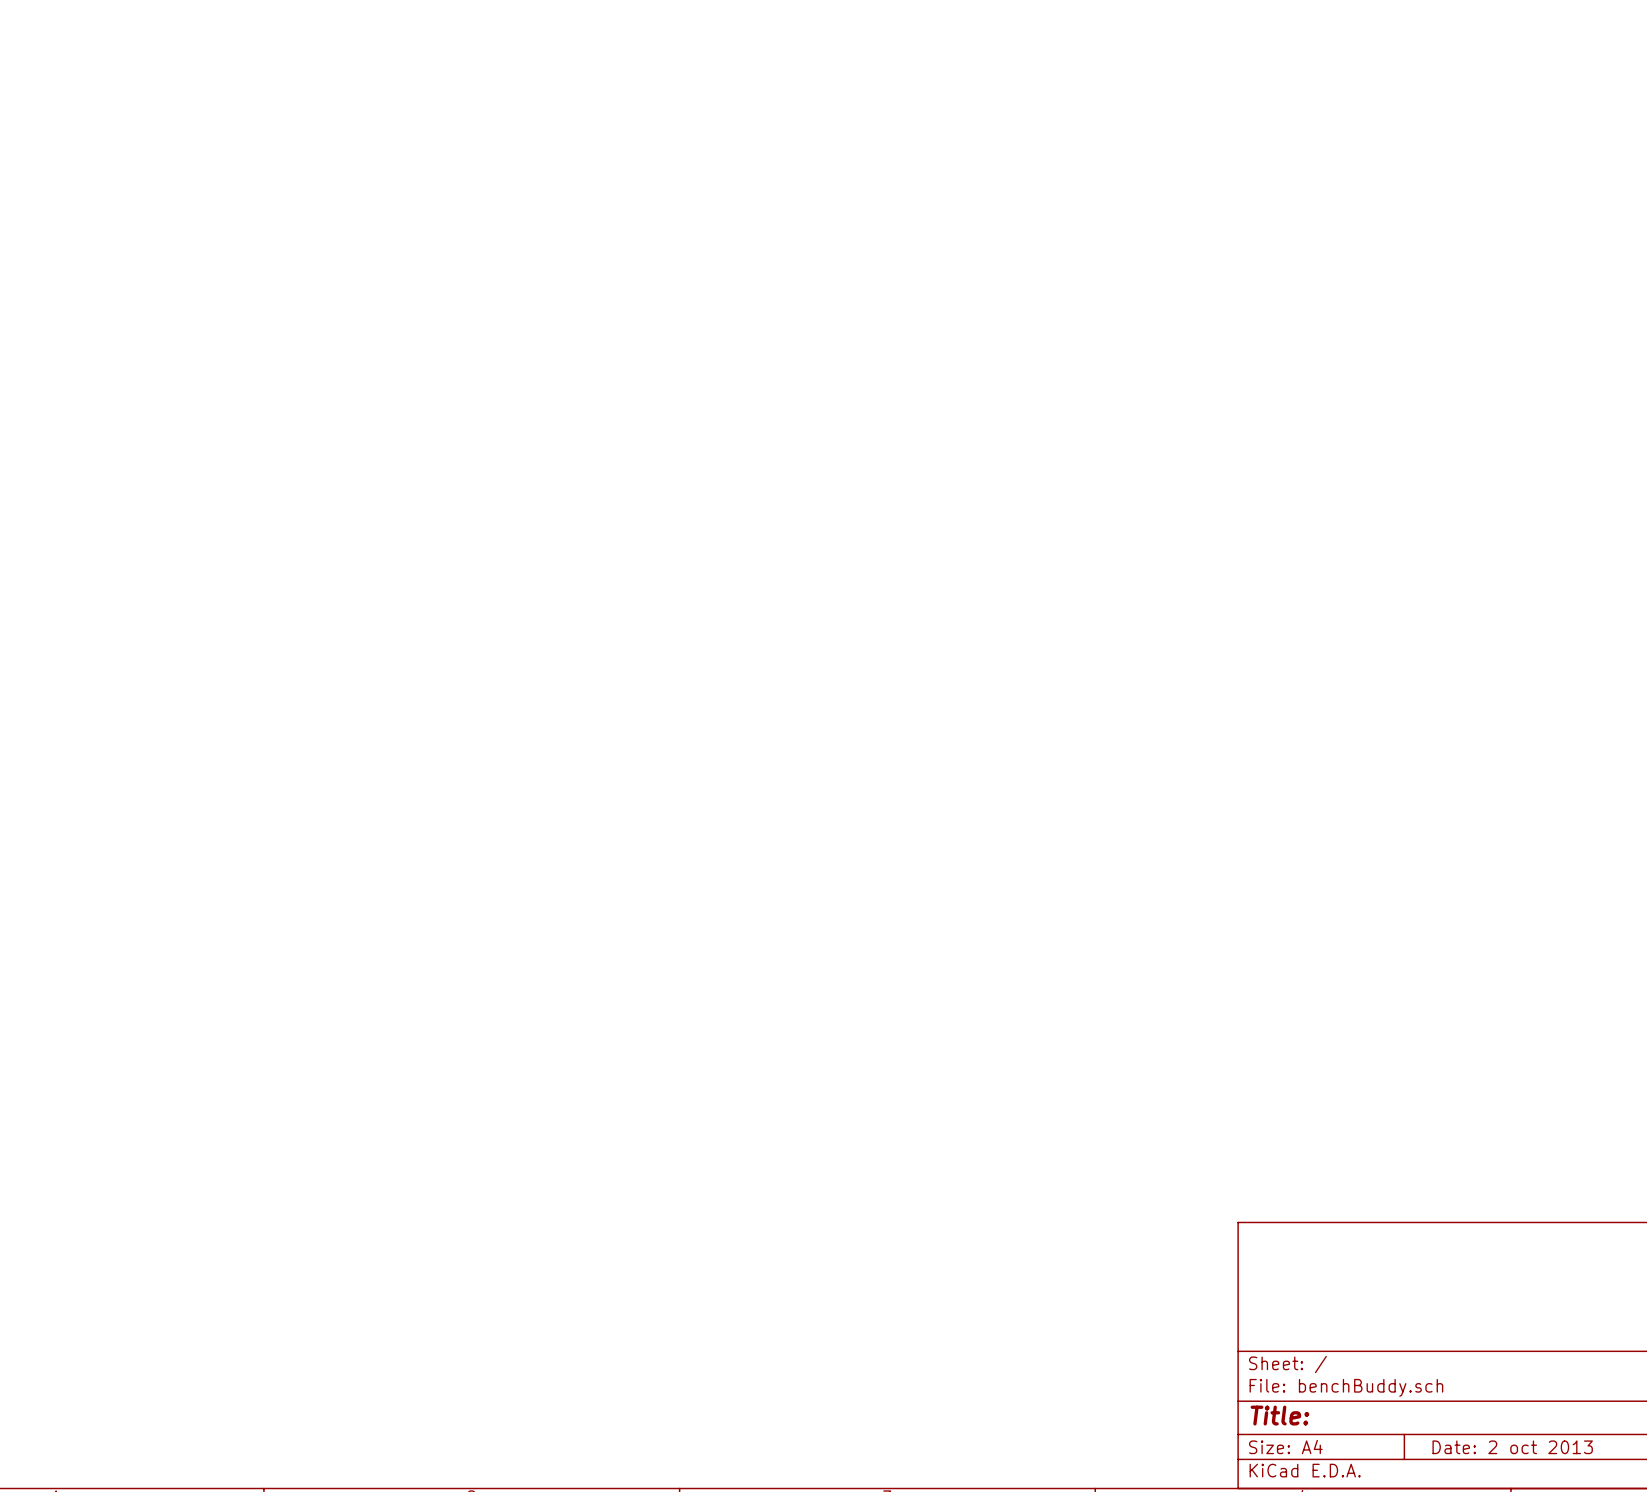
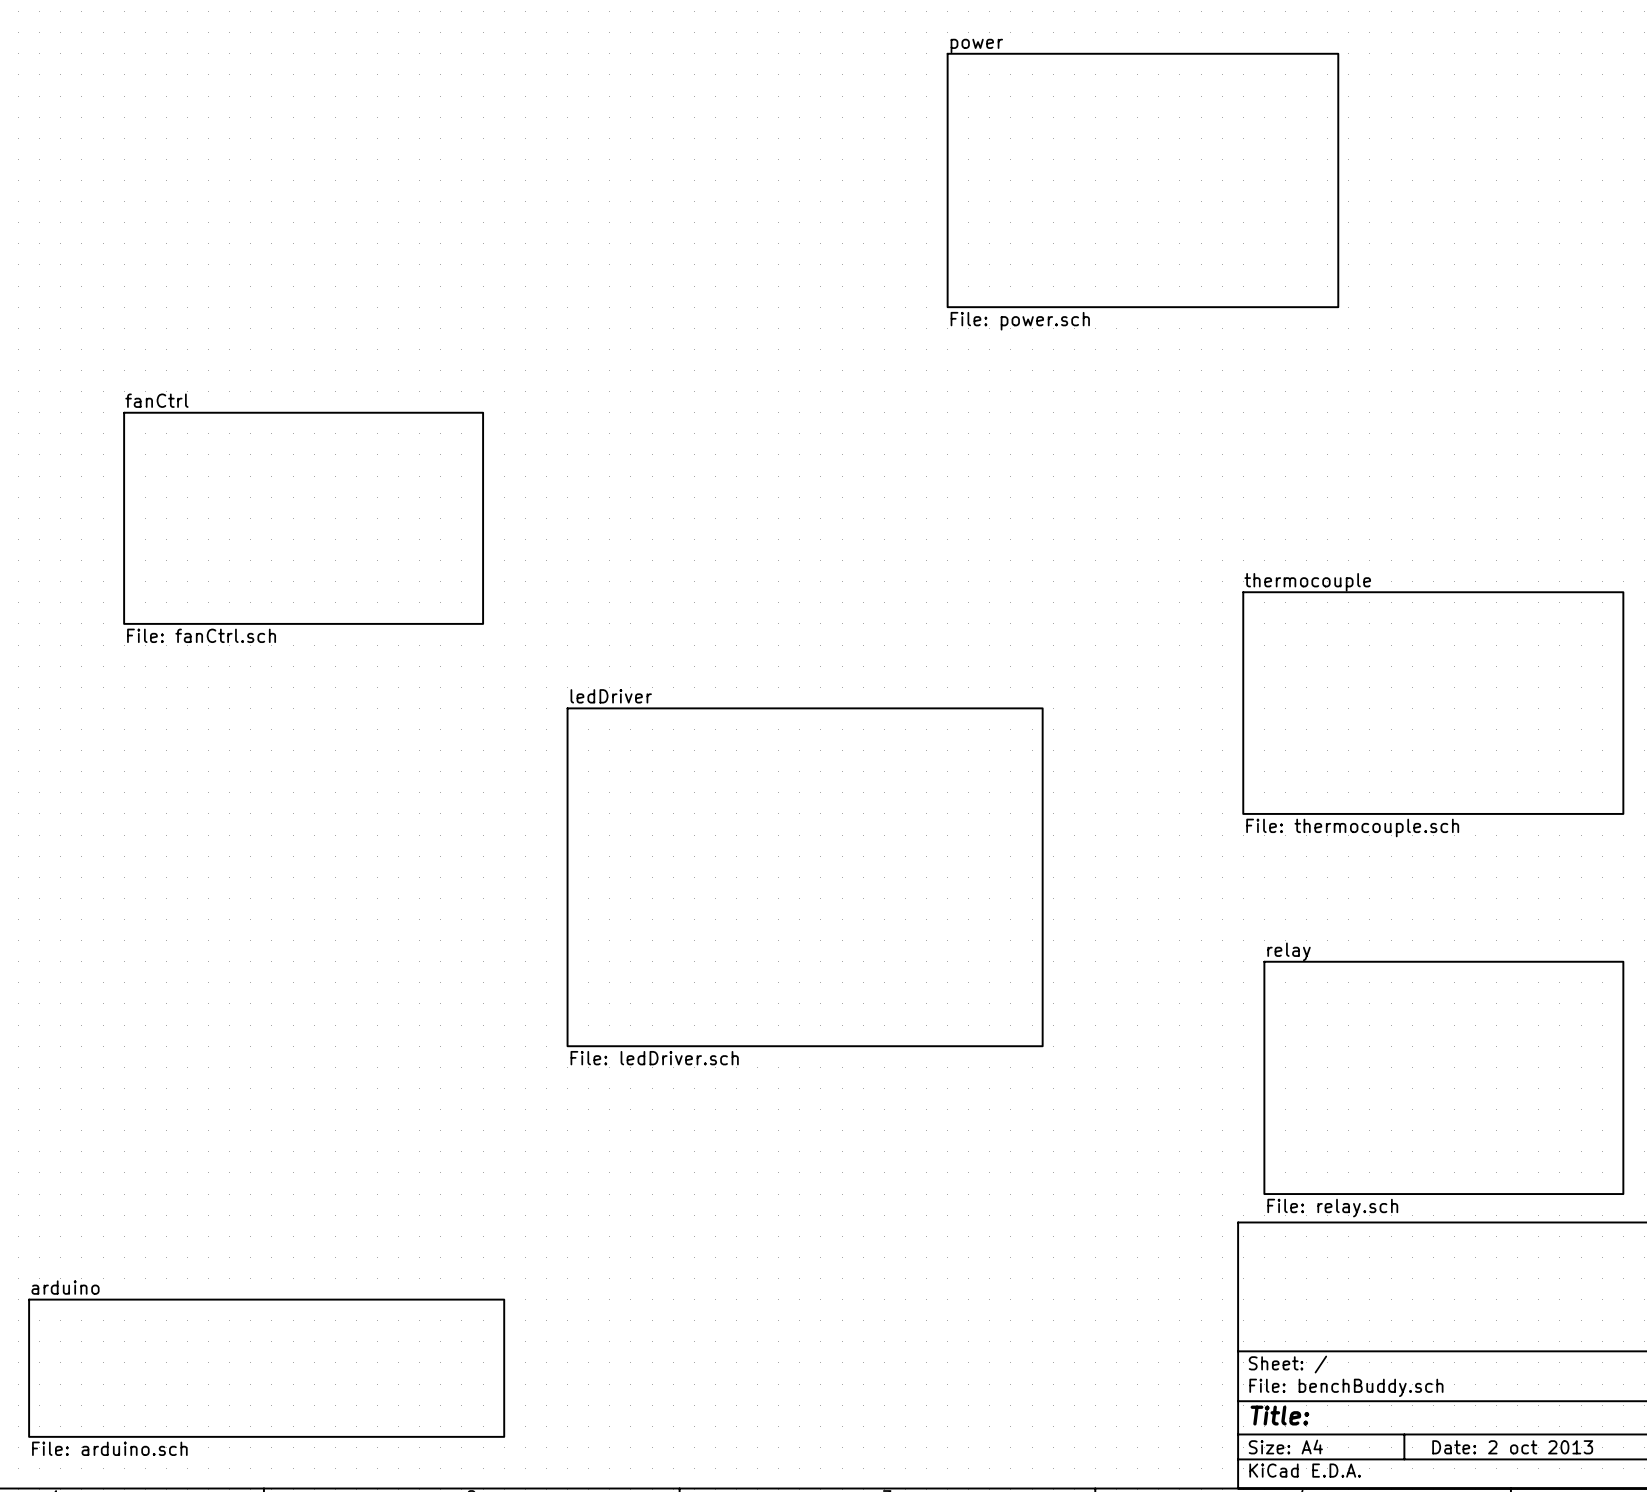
sheet power: none -> File: power.sch (1142, 180)
sheet fanCtrl: none -> File: fanCtrl.sch (303, 518)
sheet thermocouple: none -> File: thermocouple.sch (1433, 703)
sheet ledDriver: none -> File: ledDriver.sch (805, 877)
sheet relay: none -> File: relay.sch (1443, 1077)
sheet arduino: none -> File: arduino.sch (266, 1368)

